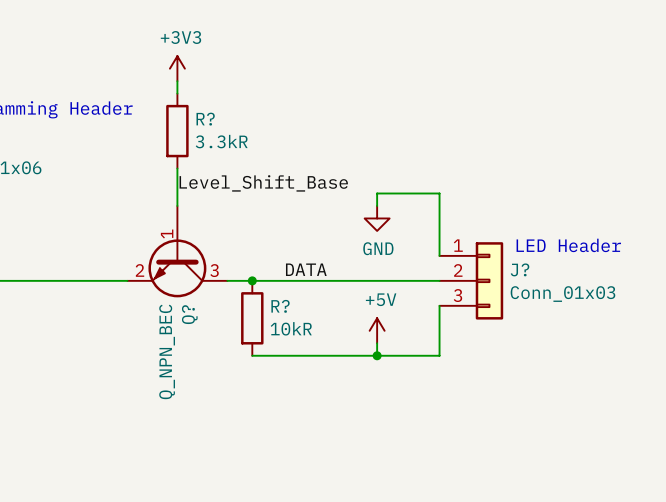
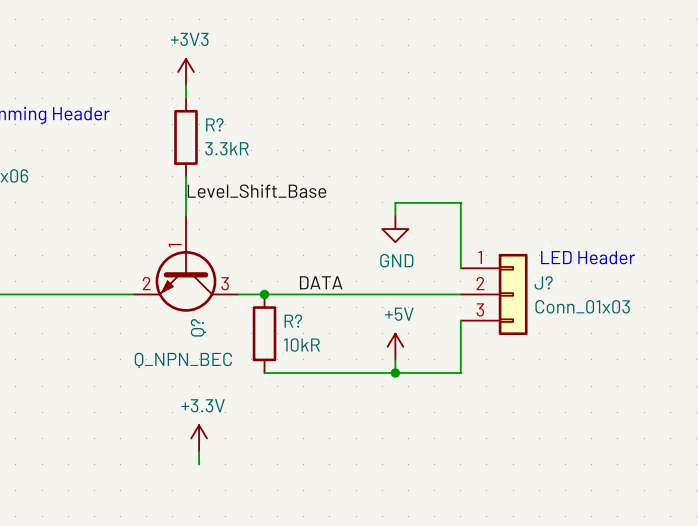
Q? value rotation: 0° (167, 351) -> 90° clockwise (183, 360)
power symbol: none -> +3.3V (199, 438)
wire: none -> (199, 451) (199, 464)

